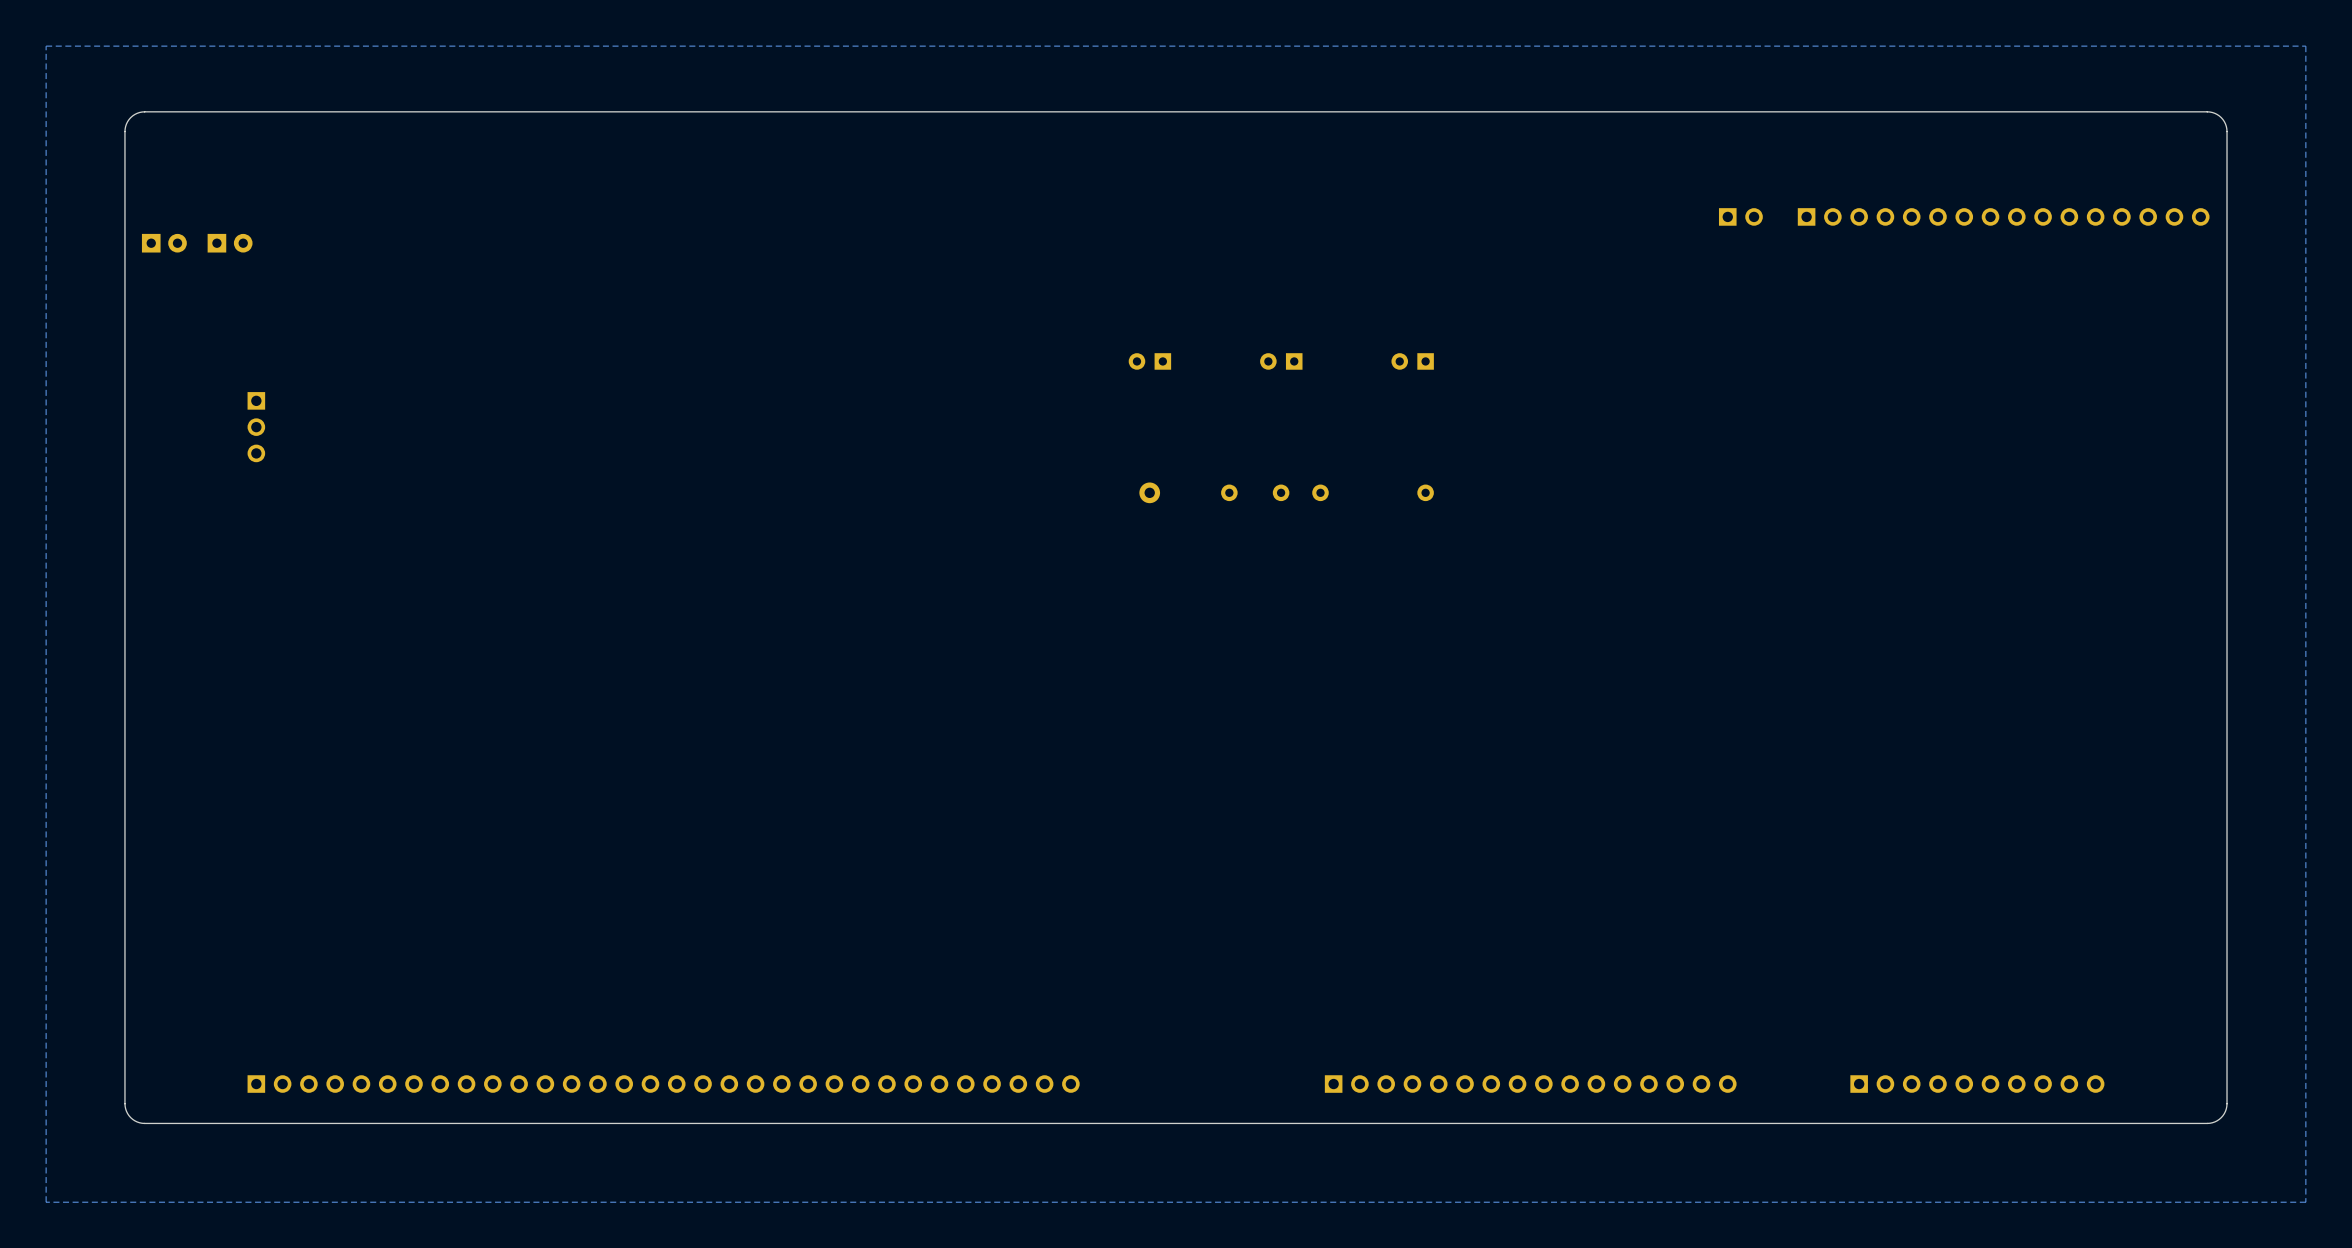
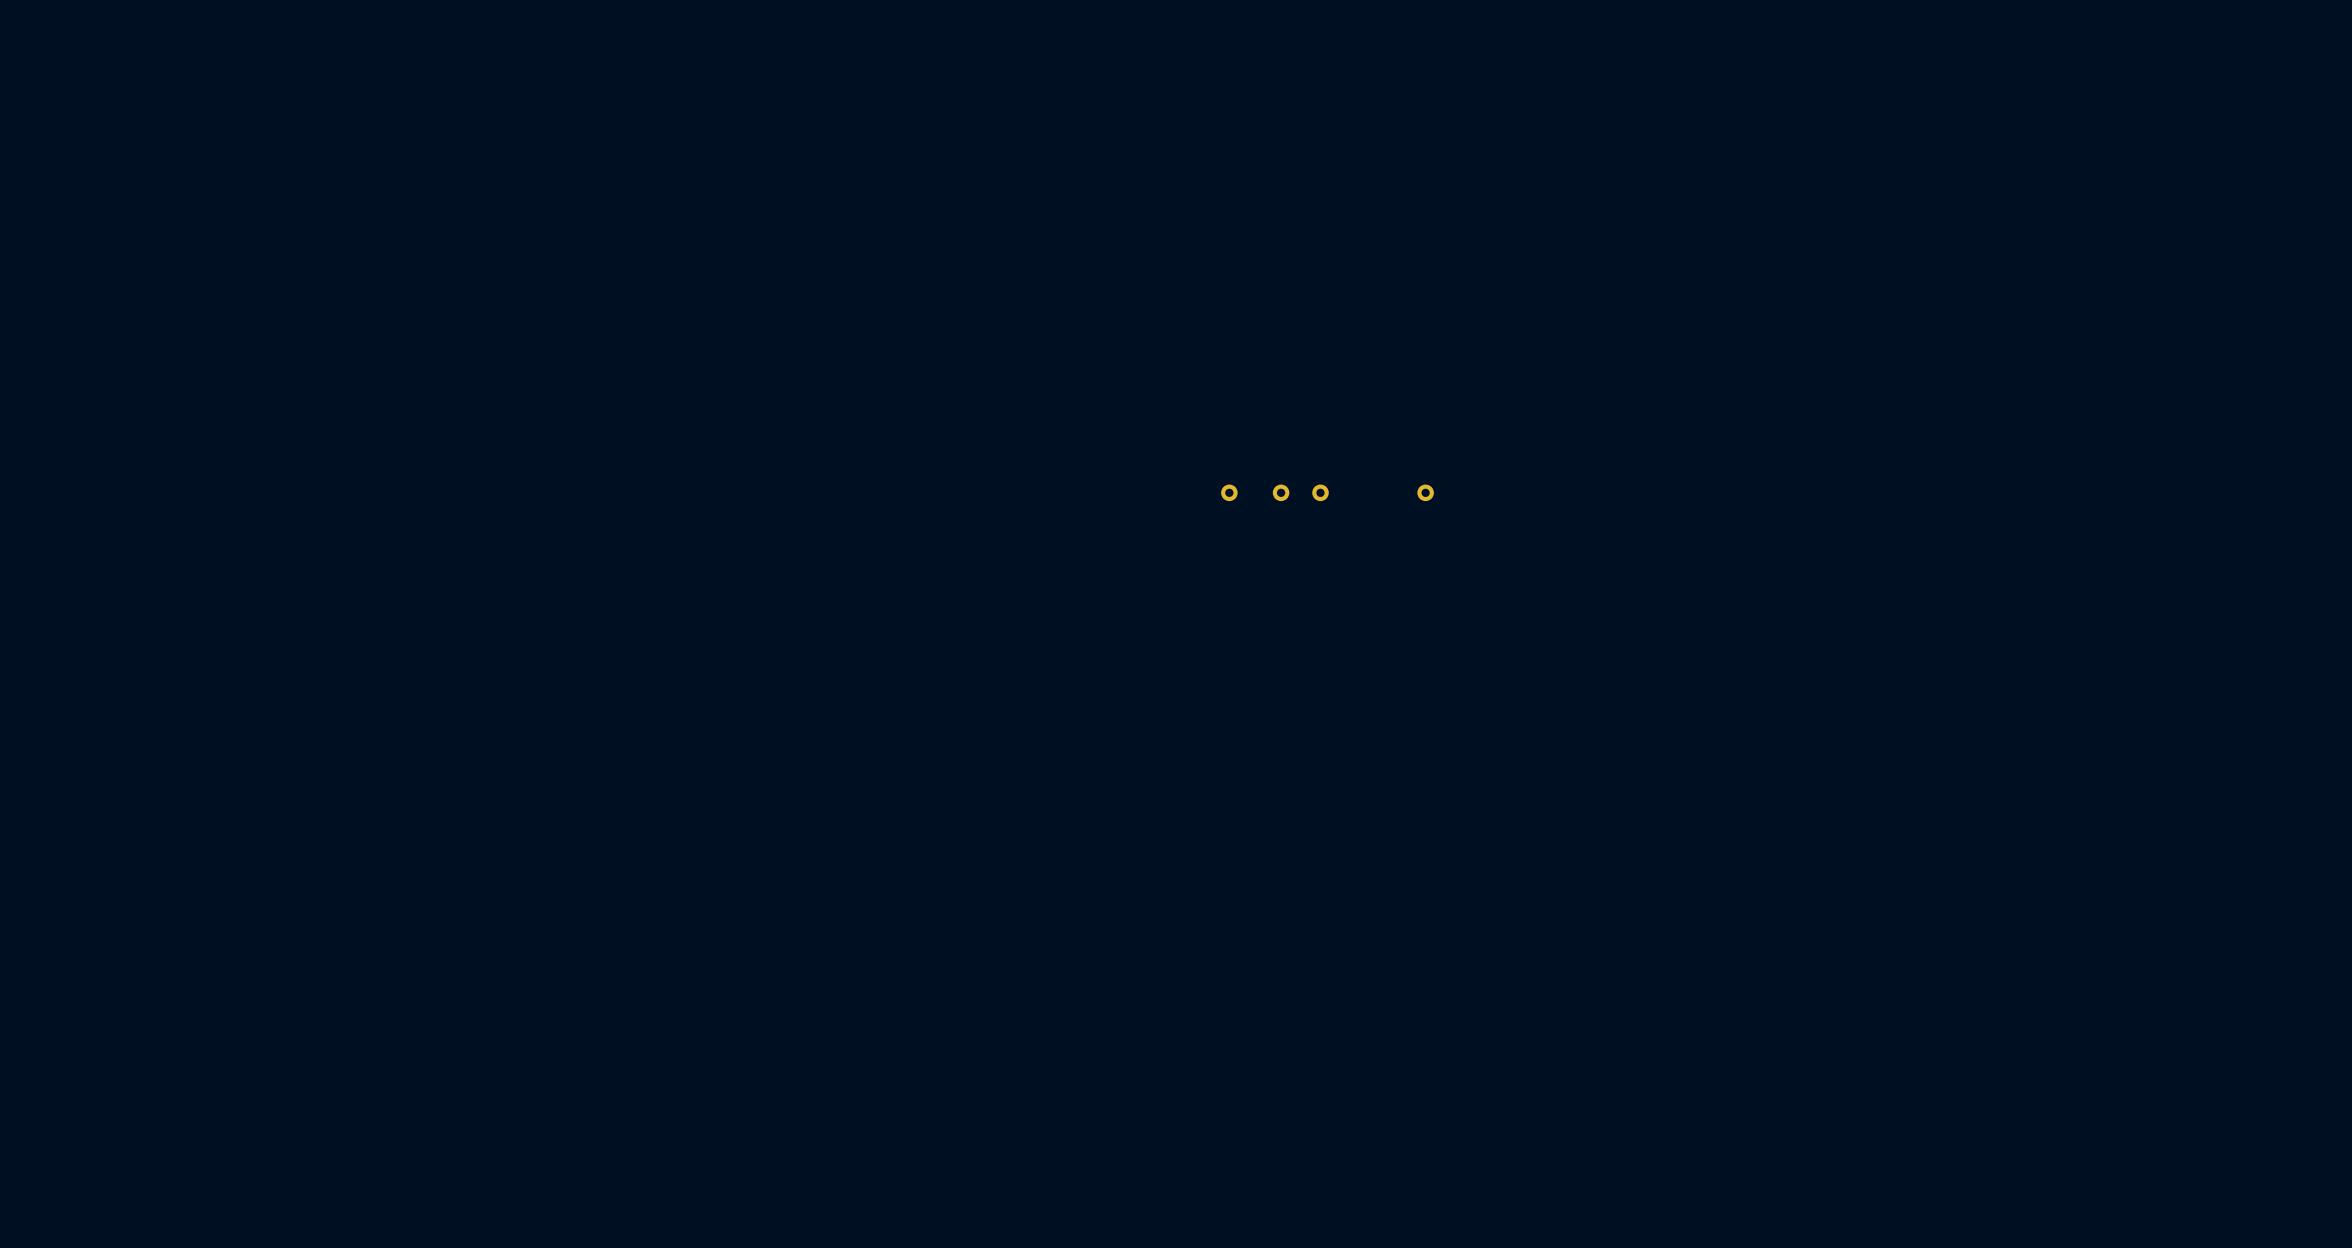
zone outline: (2305, 46) (2305, 1202) (46, 1202) (46, 46) (2305, 46) -> none
board edge: (2207, 111) (137, 113) (127, 121) (124, 131) (126, 1111) (134, 1120) (144, 1123) (2214, 1121) (2222, 1115) (2227, 1103) (2227, 131) (2225, 124) (2221, 117) (2214, 113) (2207, 111) -> none
part: (1740, 216) -> none
part: (2003, 216) -> none
part: (164, 243) -> none
part: (230, 243) -> none
part: (1149, 361) -> none
part: (1281, 361) -> none
part: (1412, 361) -> none
part: (256, 427) -> none
part: (1149, 492) -> none
part: (663, 1084) -> none
part: (1530, 1084) -> none
part: (1977, 1084) -> none

